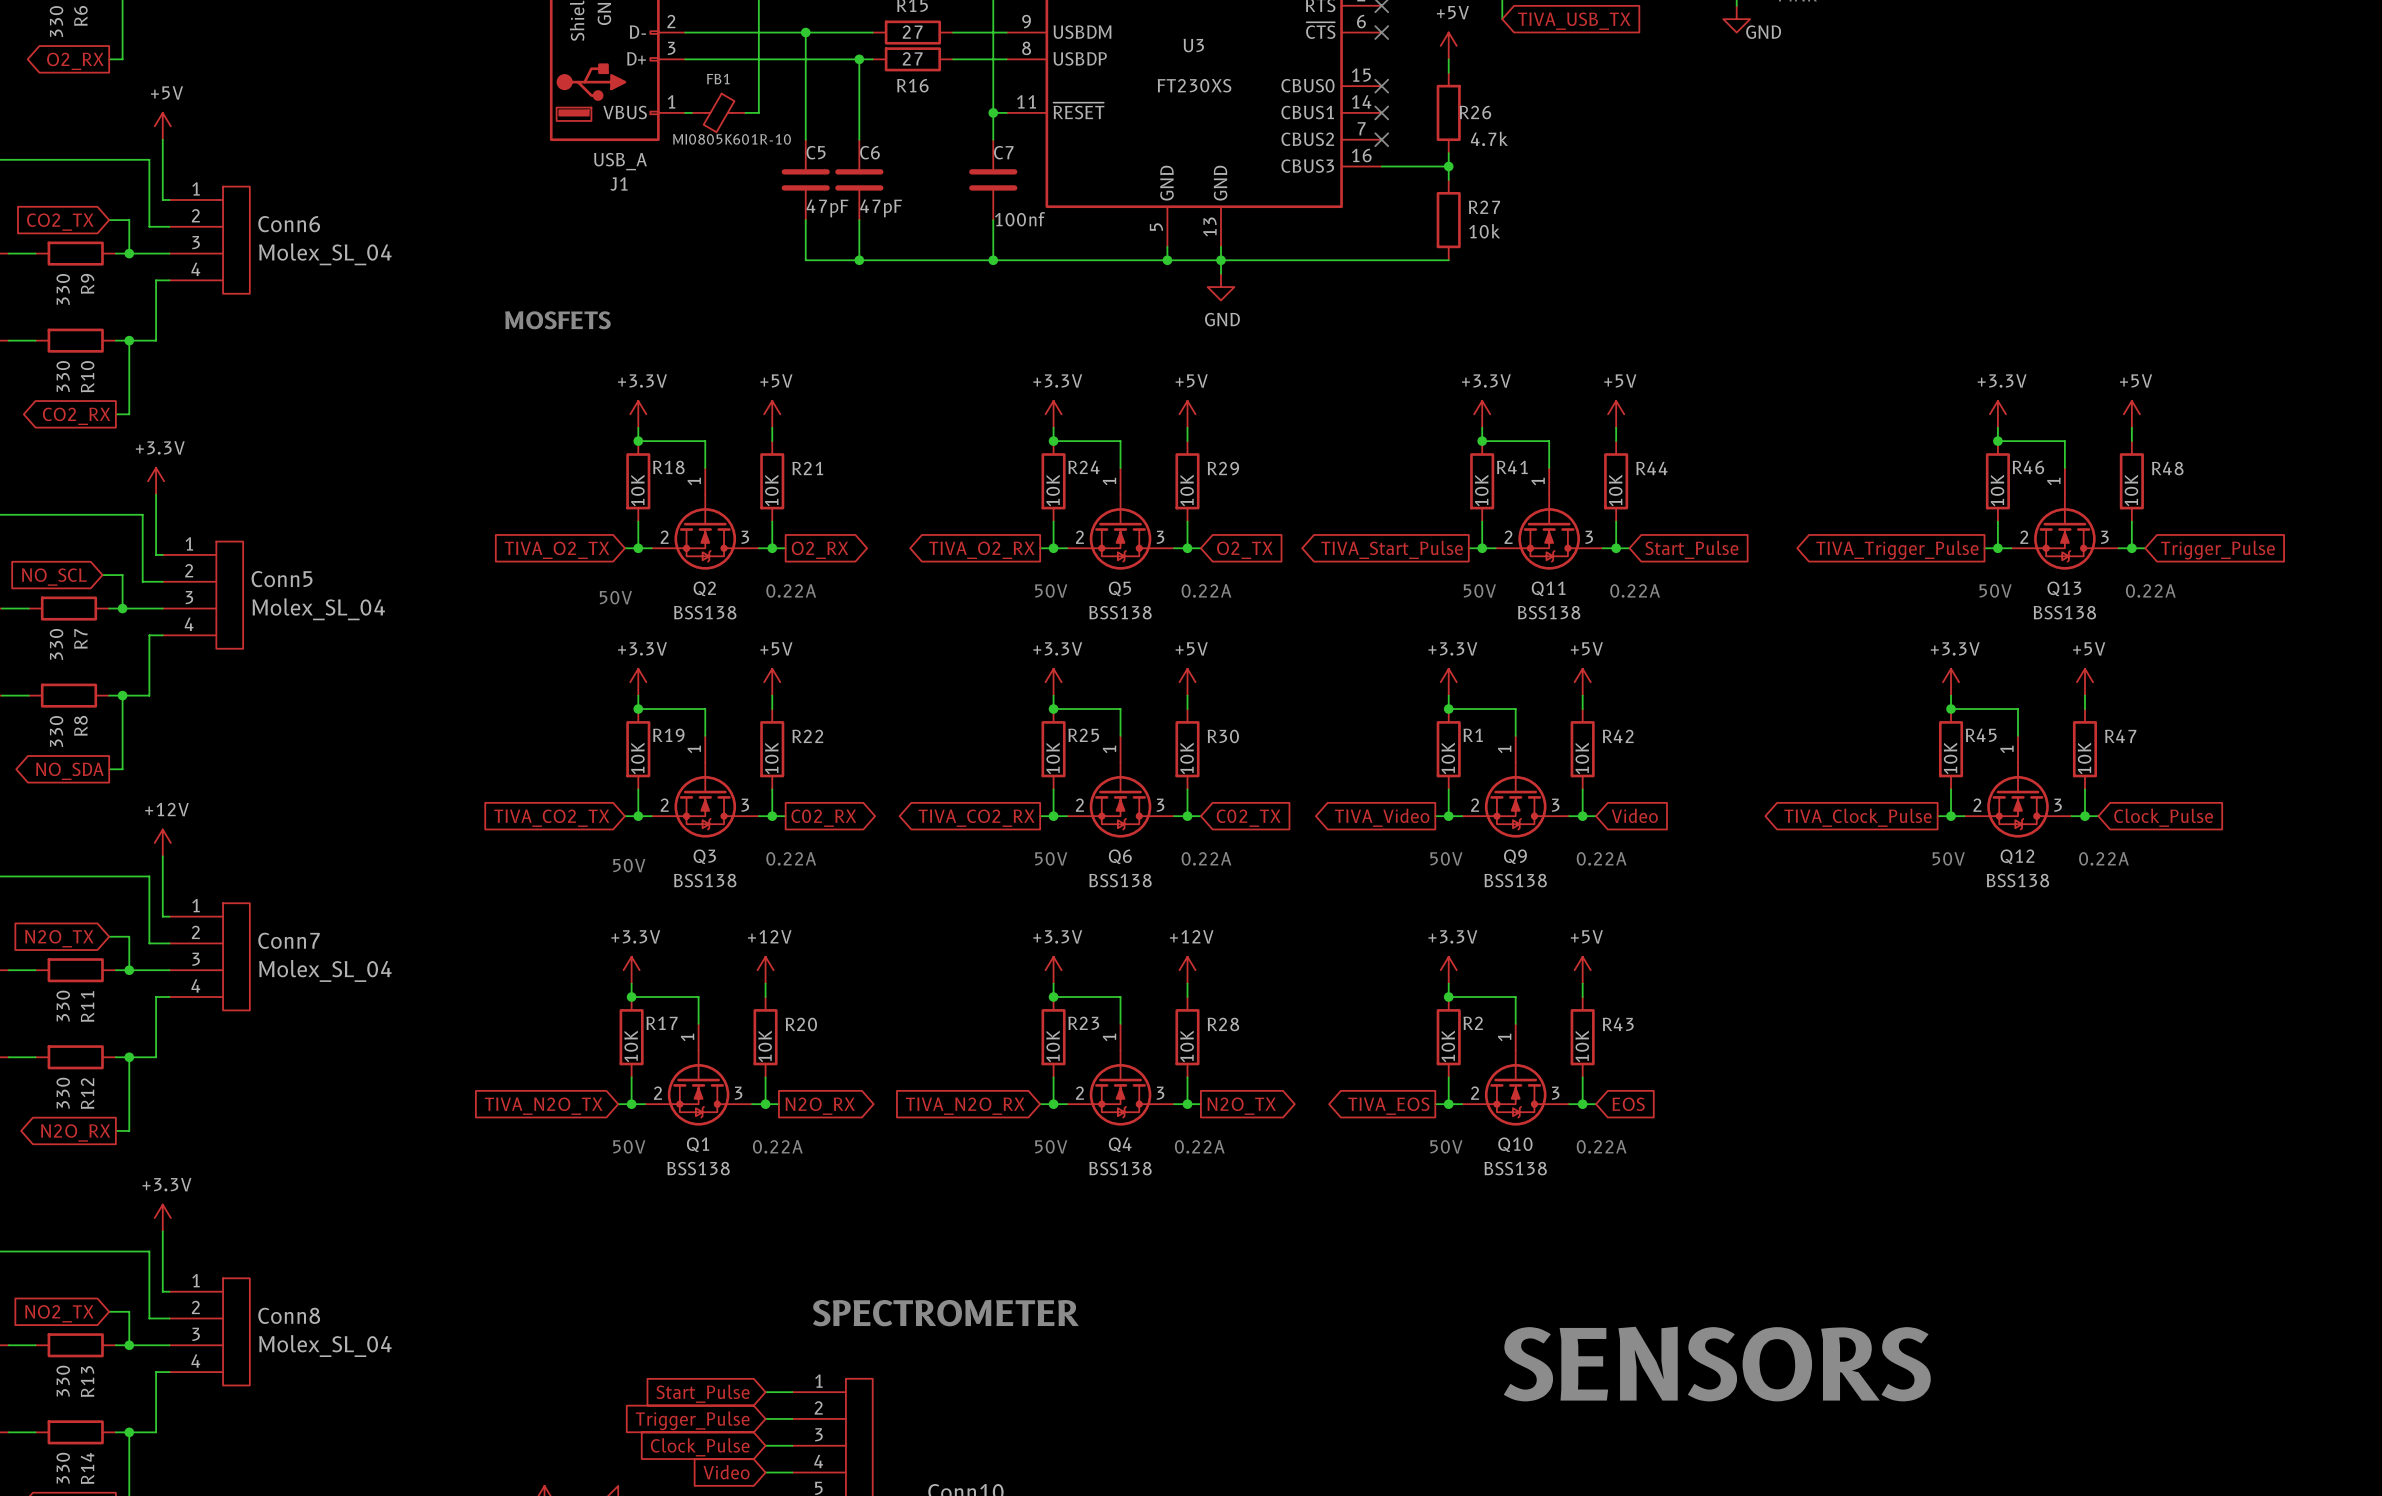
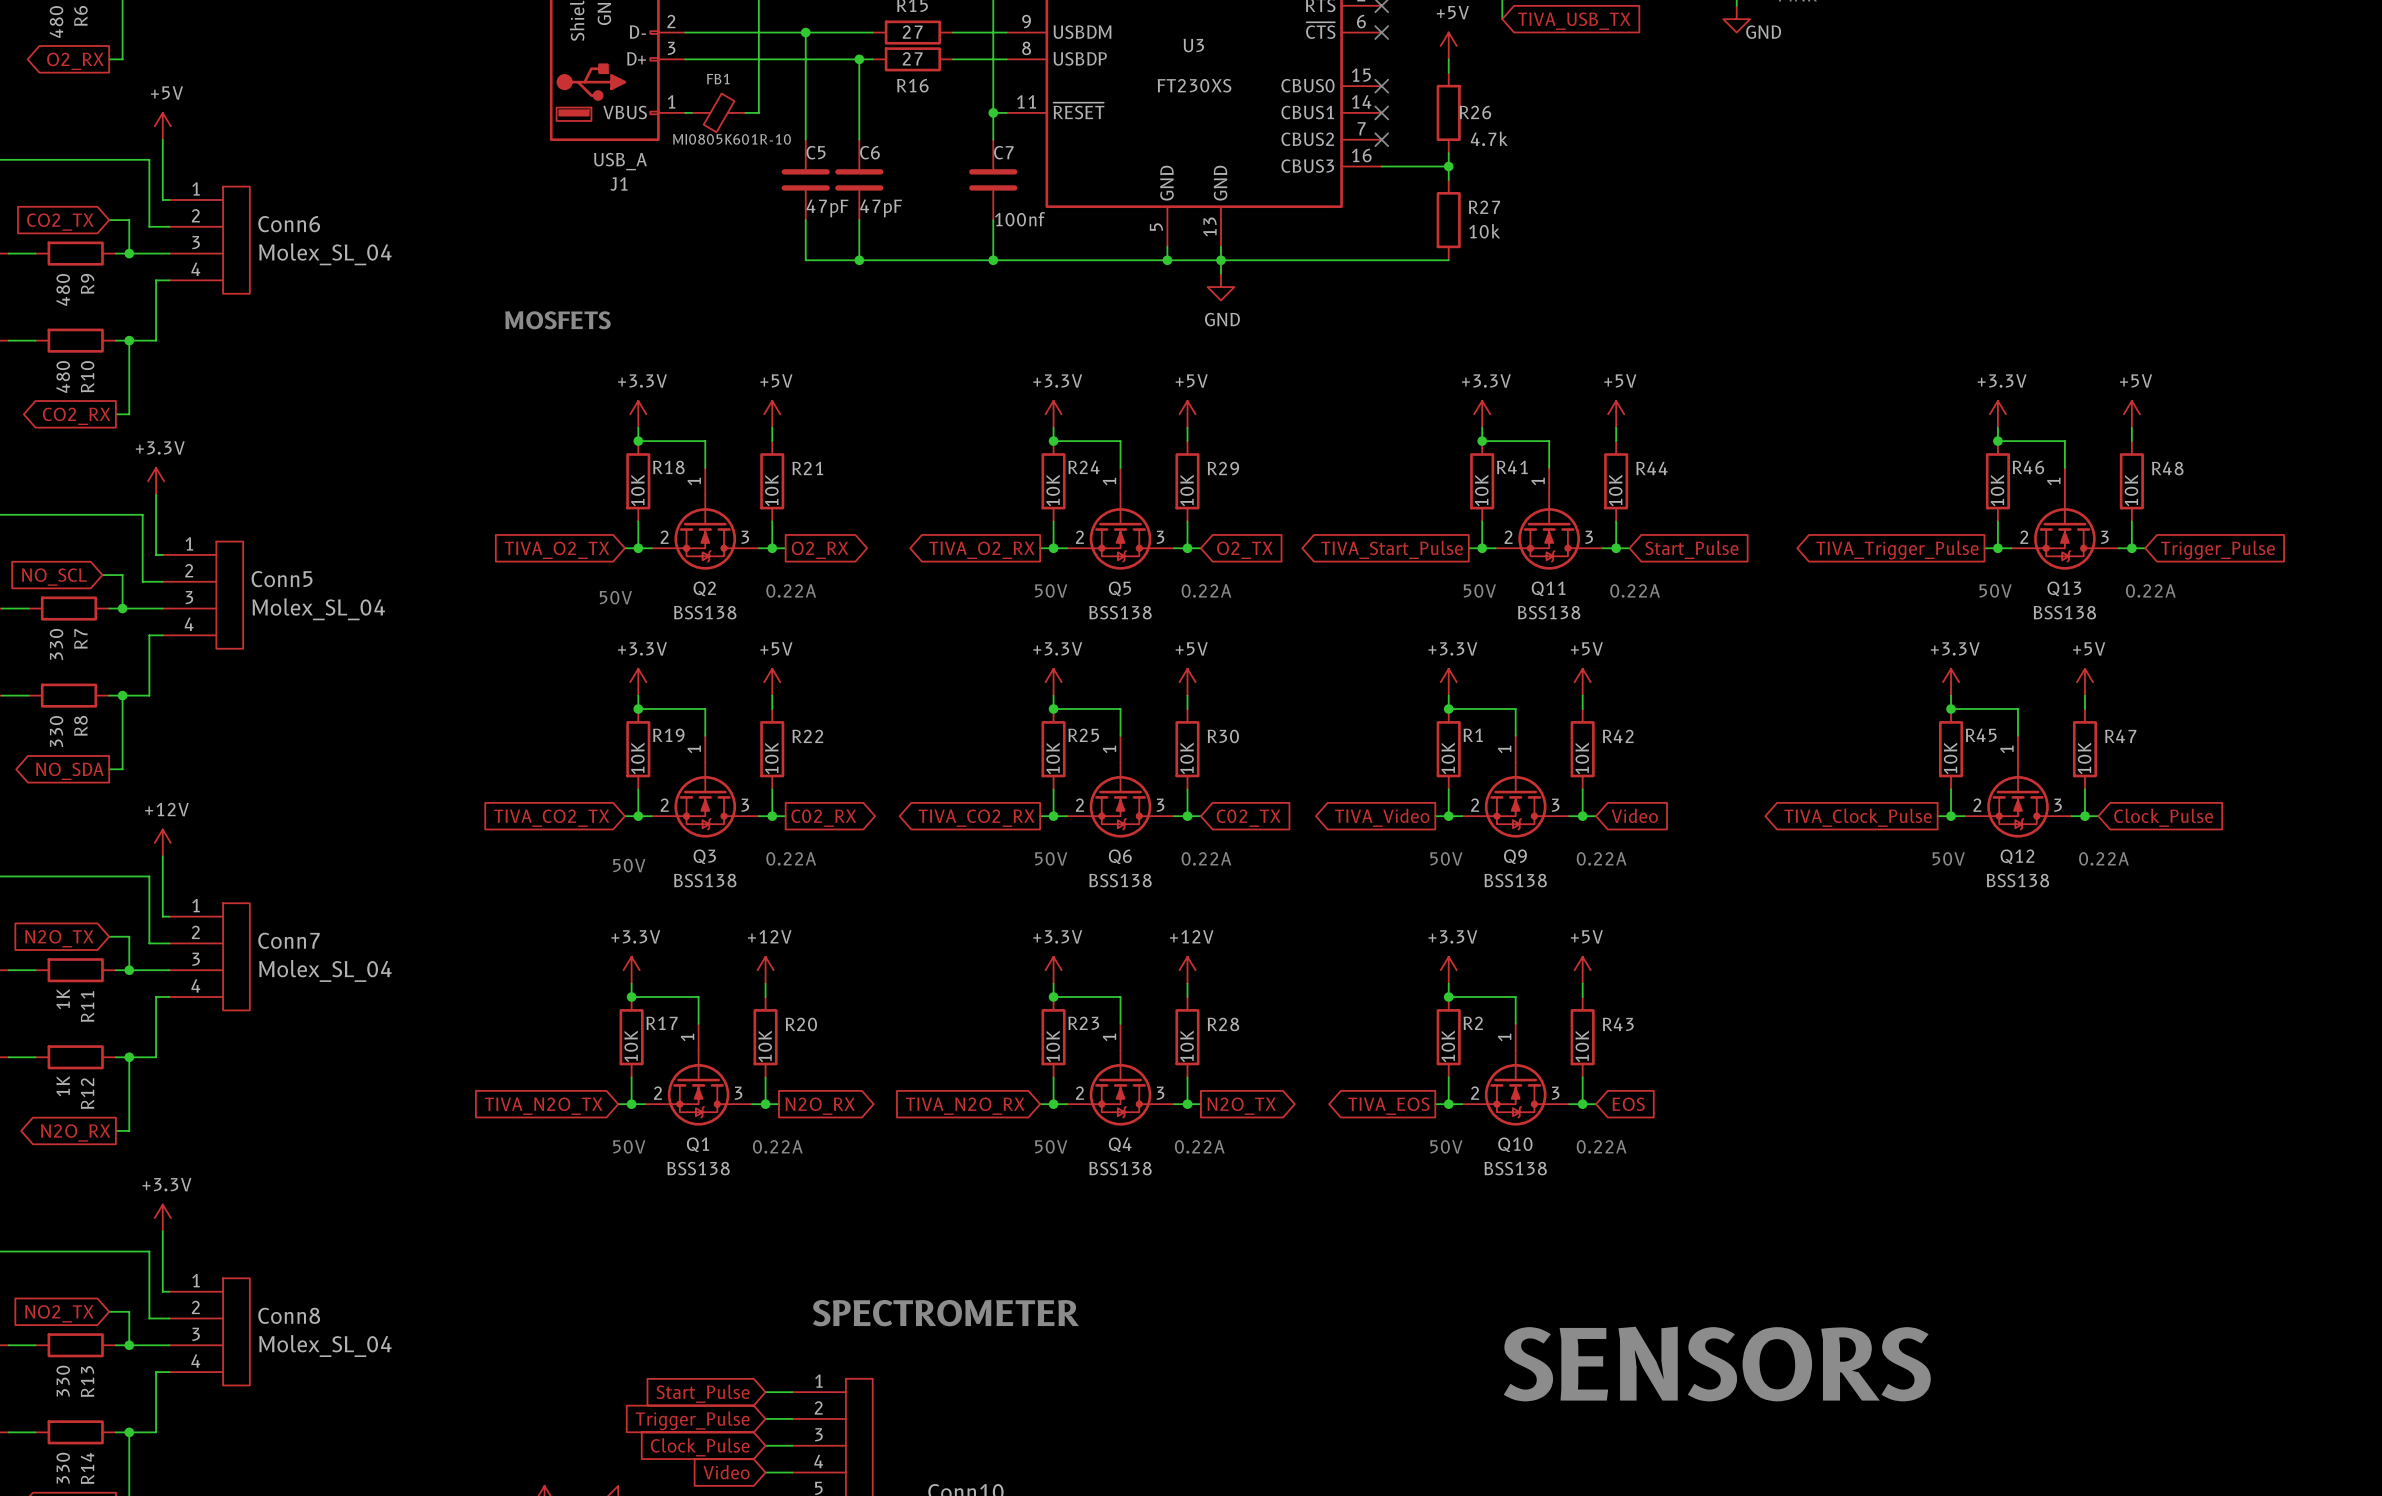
R6 value: 330 (56, 21) -> 480 (56, 22)
R9 value: 330 (63, 289) -> 480 (63, 289)
R10 value: 330 (63, 376) -> 480 (63, 376)
R11 value: 330 (63, 1006) -> 1K (63, 999)
R12 value: 330 (63, 1093) -> 1K (63, 1086)

